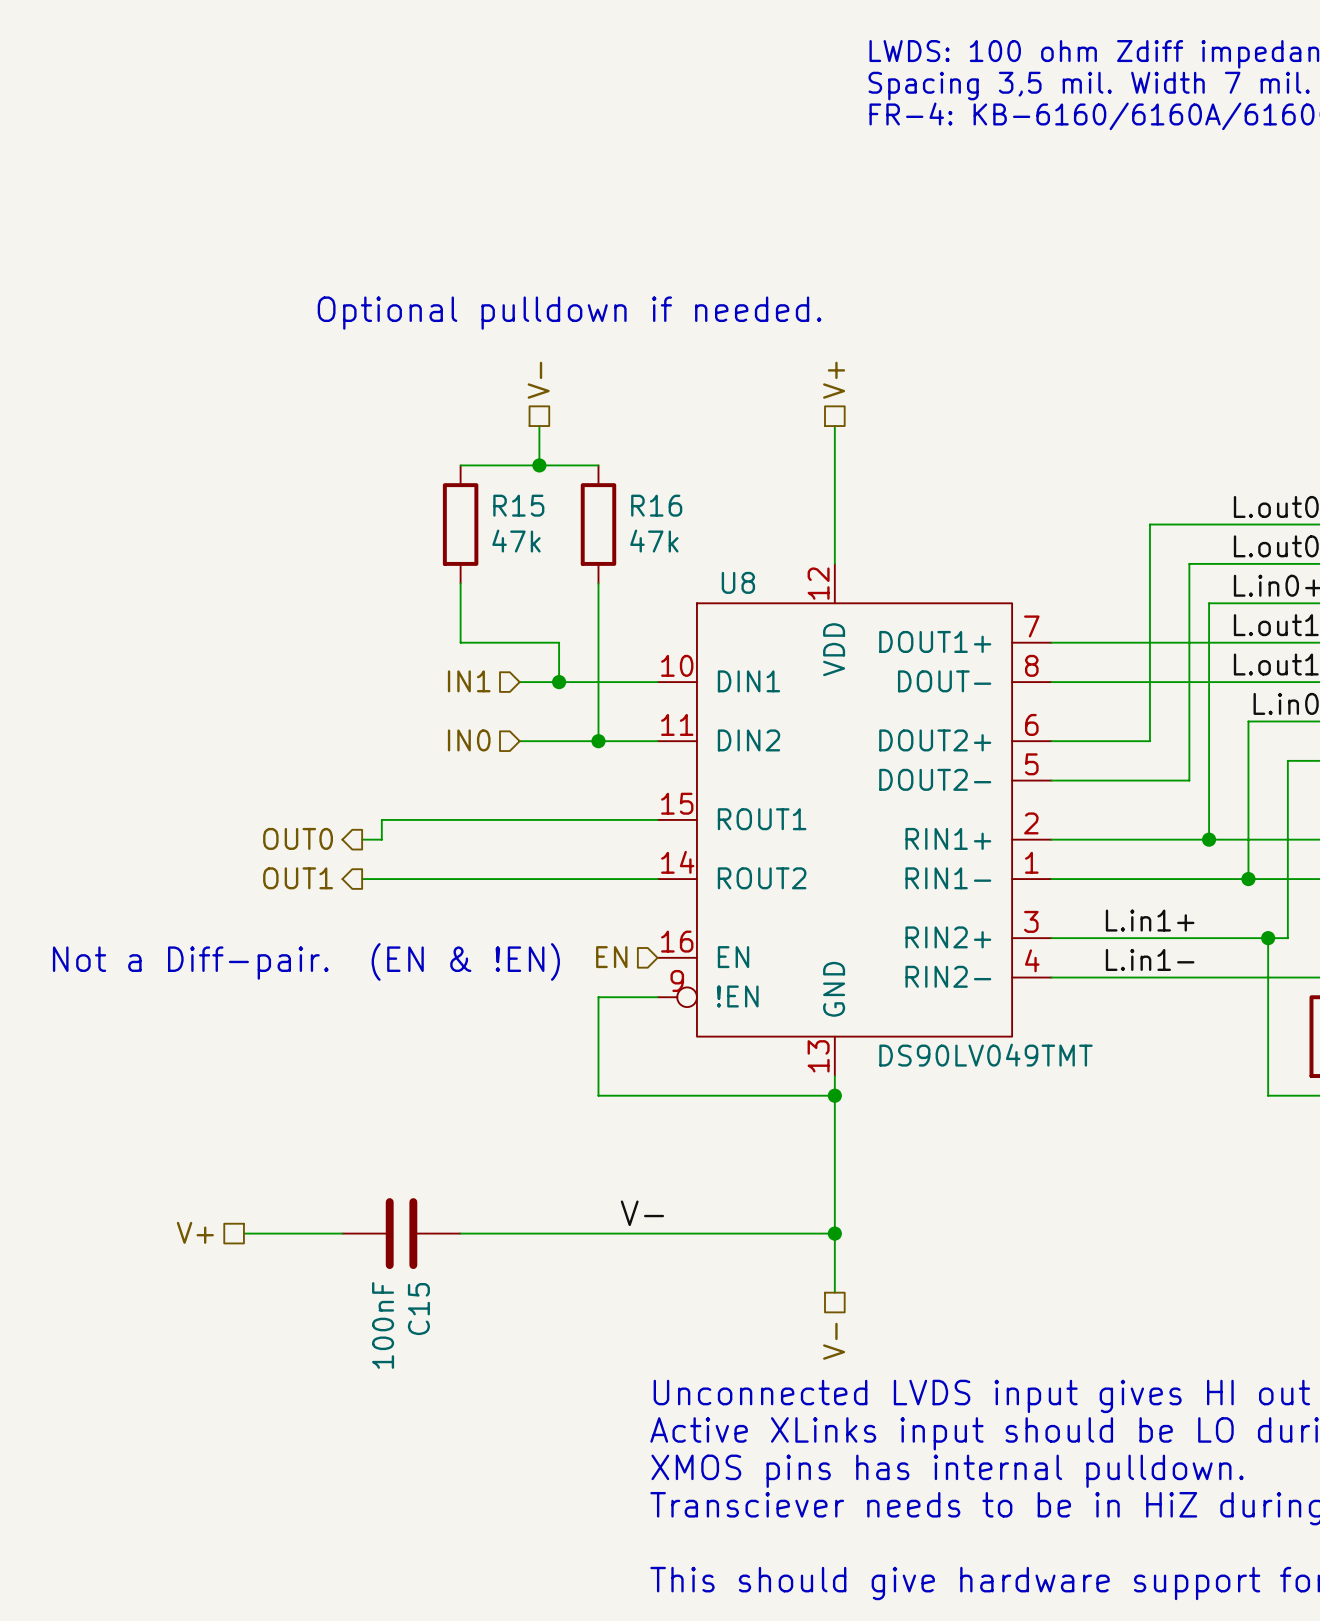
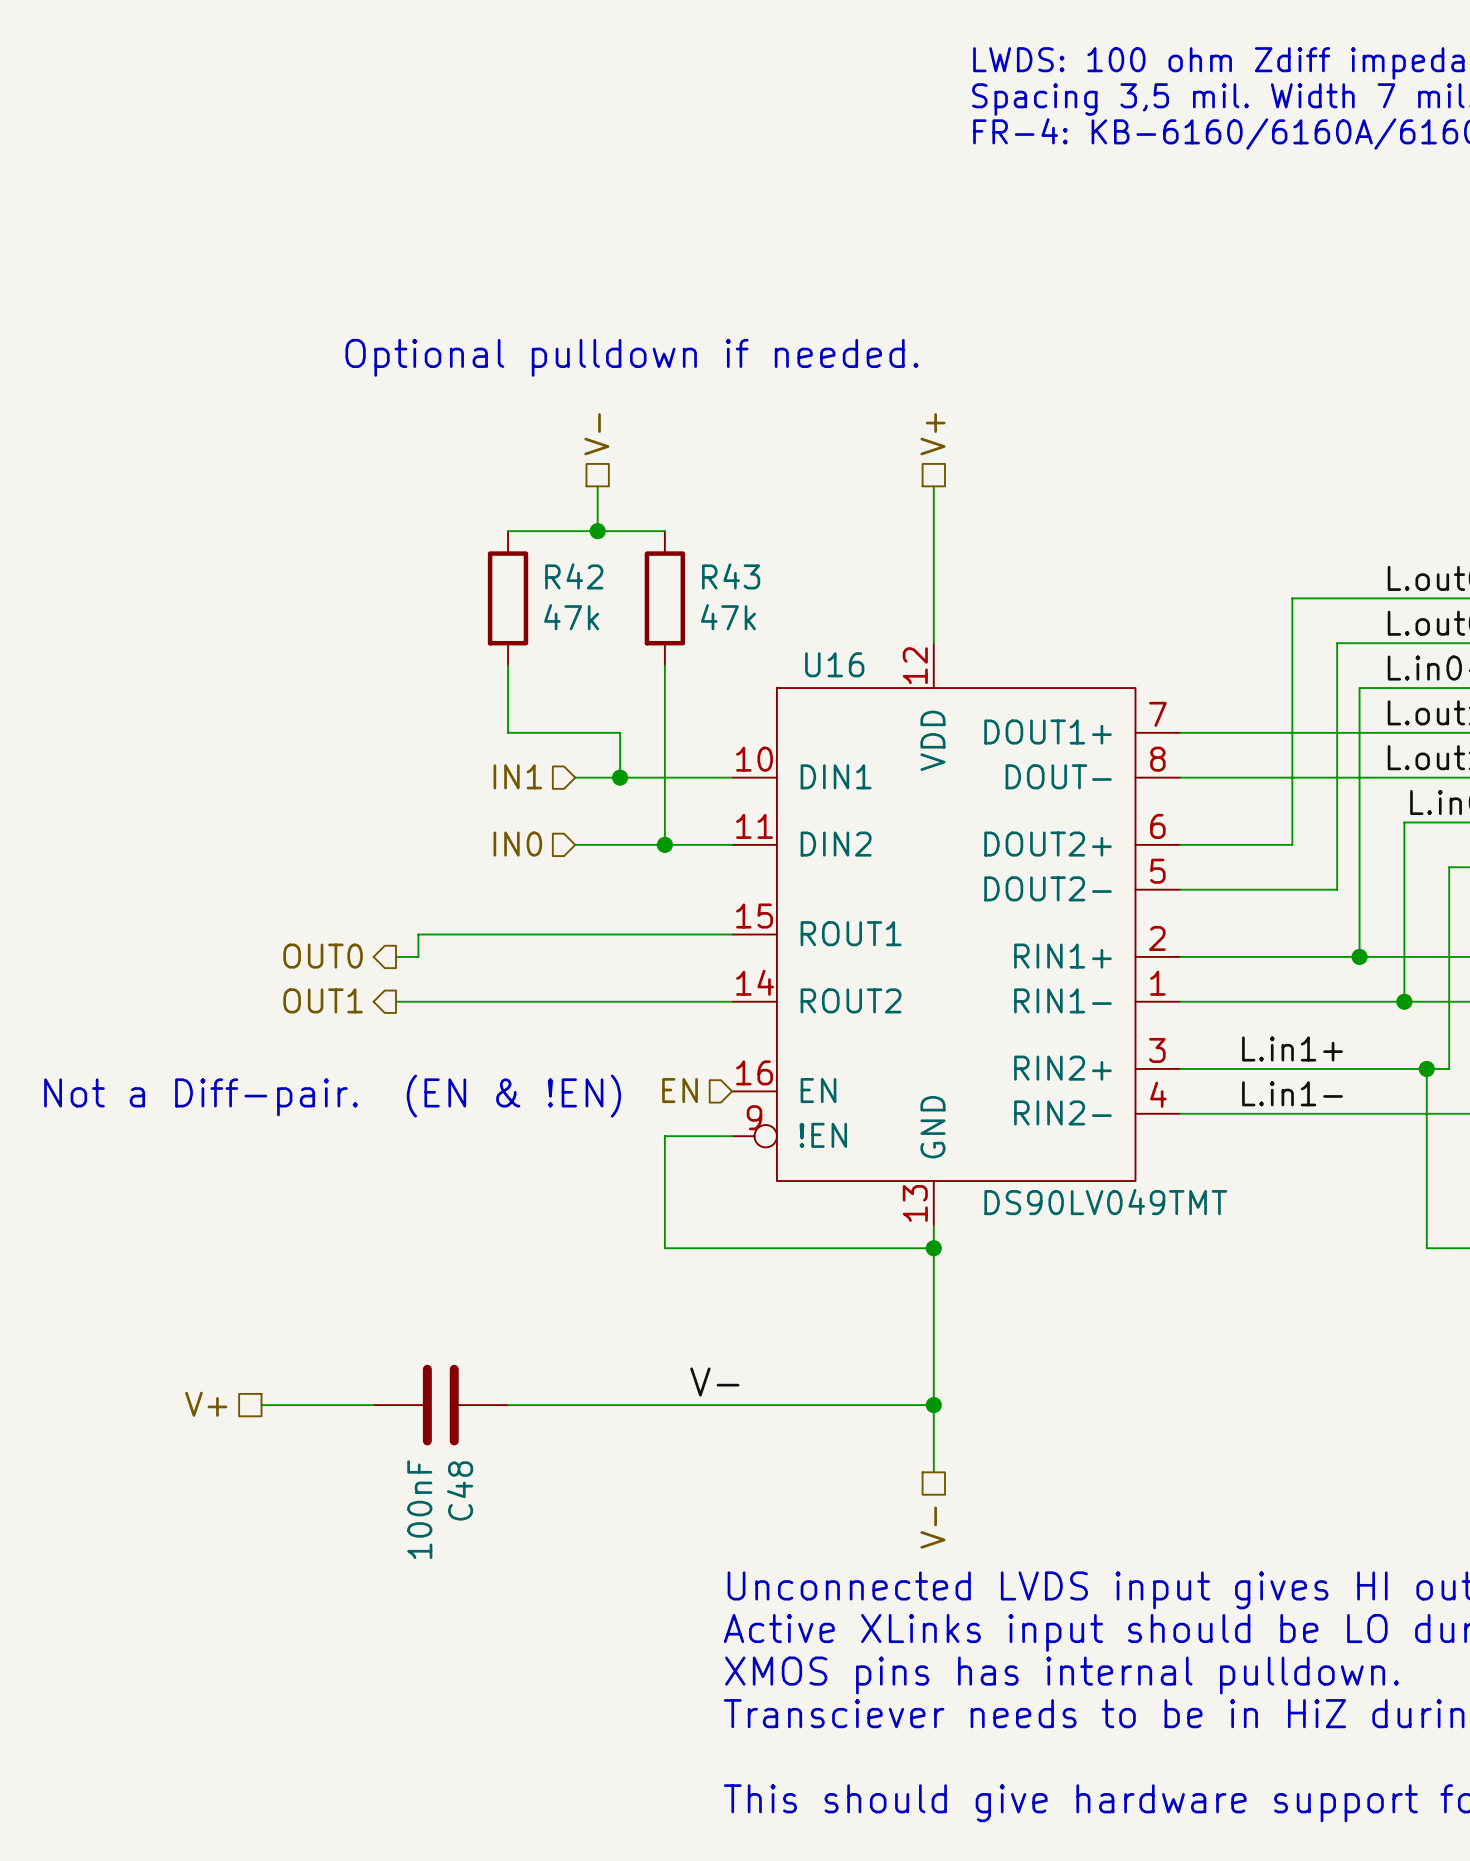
R15 name: R15 (518, 505) -> R42 (574, 576)
R16 name: R16 (656, 505) -> R43 (731, 576)
U8 name: U8 (738, 582) -> U16 (834, 664)
C15 name: C15 (418, 1309) -> C48 (460, 1490)

